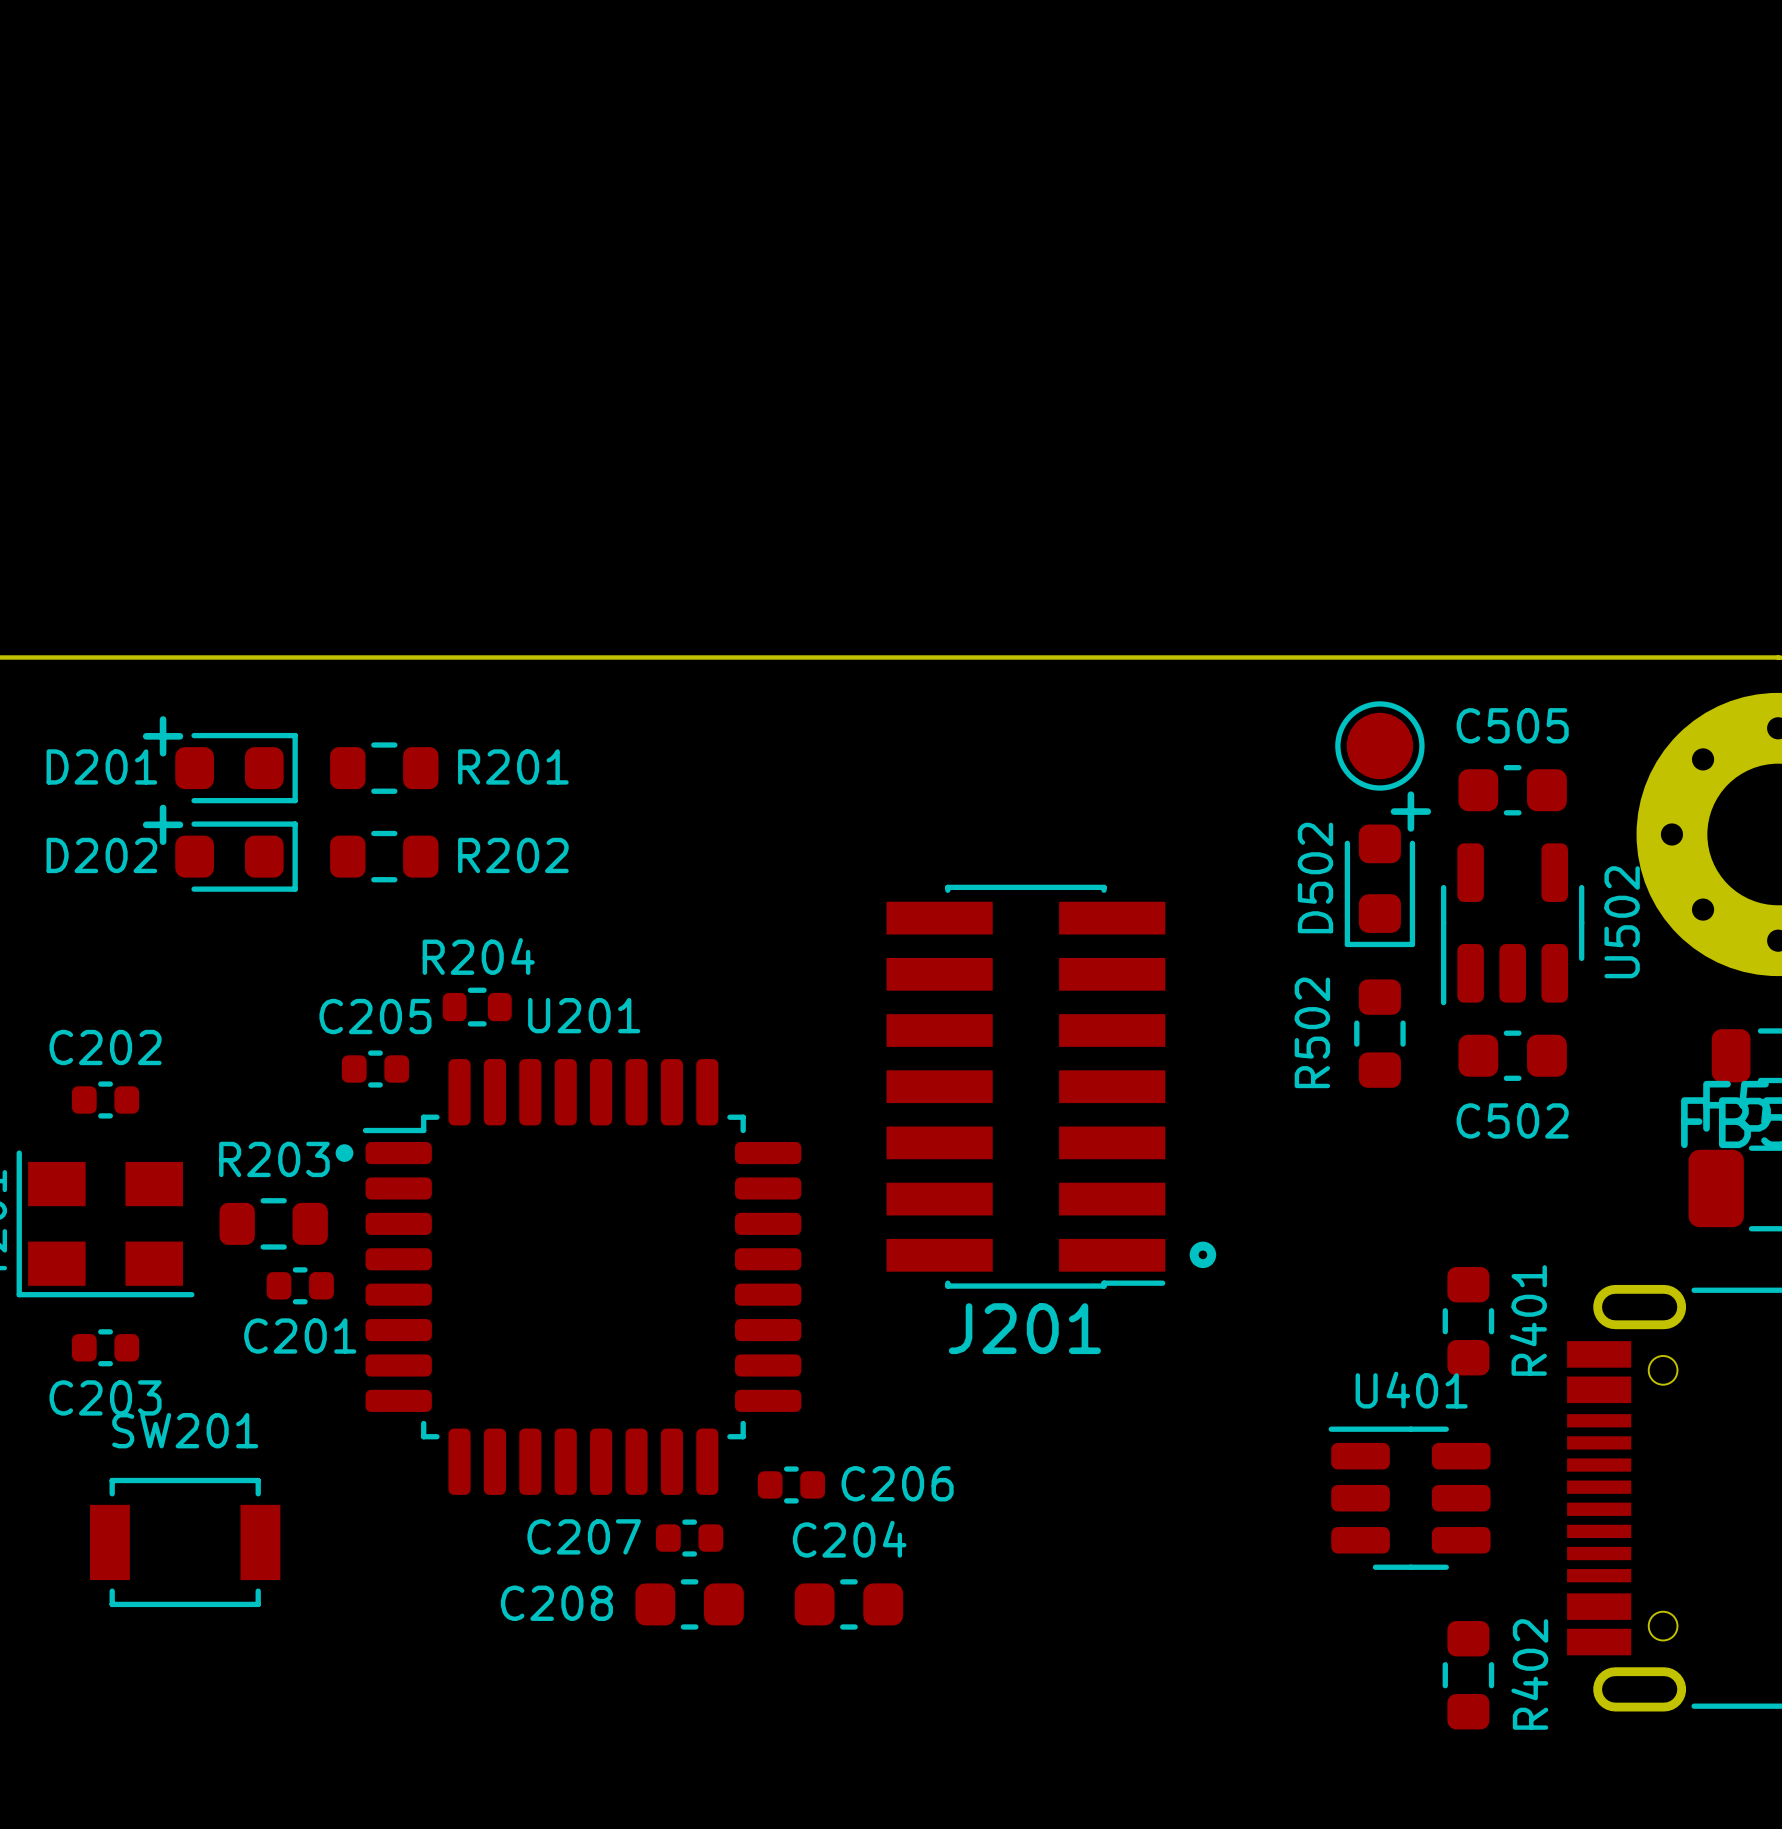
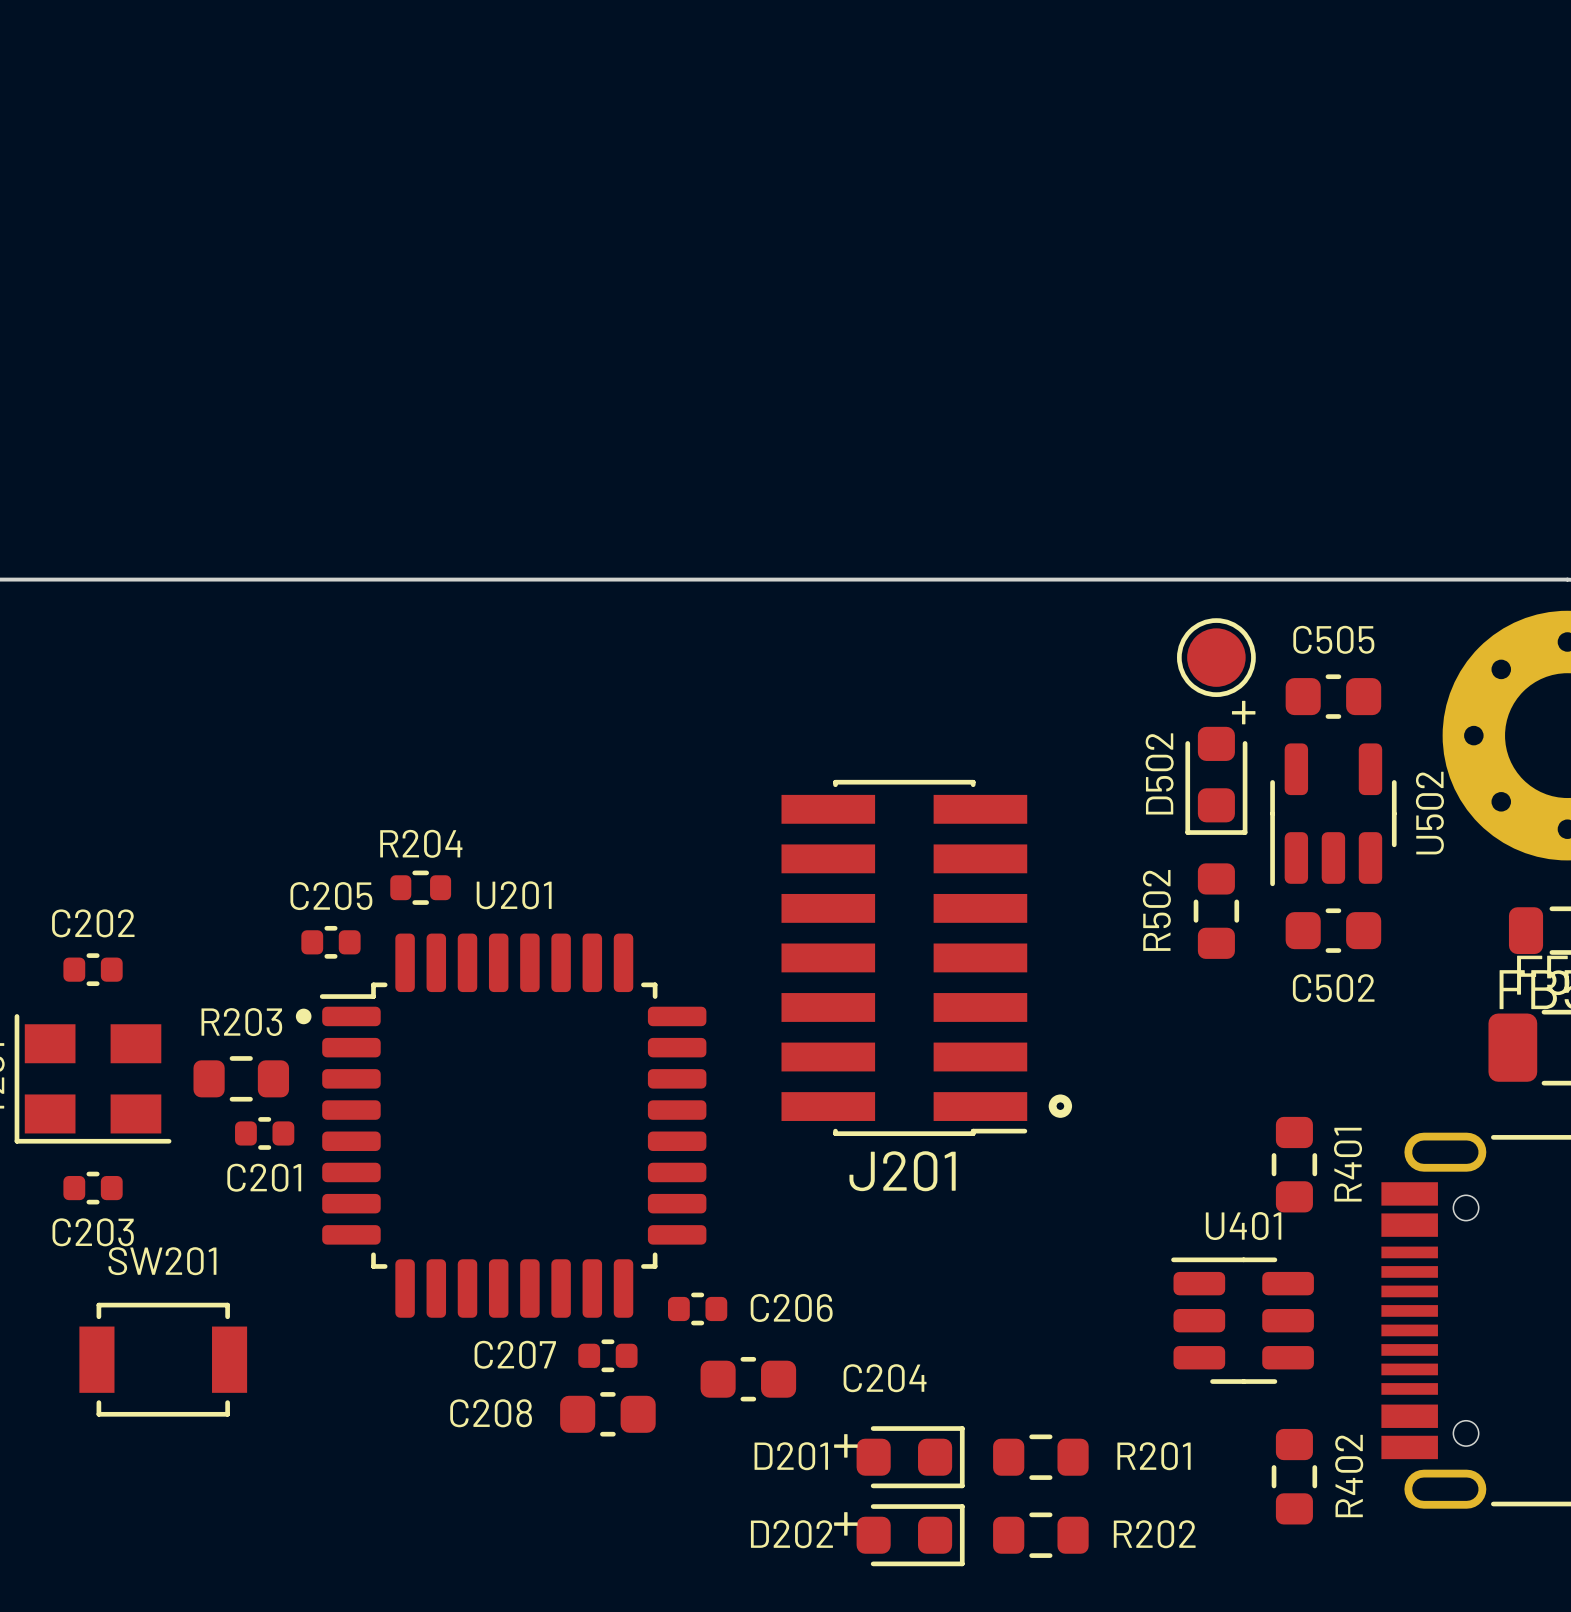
text: + (163, 736) -> none
D201 position: (236, 768) -> (910, 1457)
R201 position: (384, 768) -> (1040, 1457)
text: + (163, 824) -> none
D202 position: (236, 856) -> (910, 1535)
R202 position: (384, 856) -> (1040, 1535)
C204 name position: C204 (849, 1539) -> C204 (885, 1378)
C204 position: (848, 1604) -> (748, 1379)
text: none -> + (845, 1445)
text: none -> + (845, 1523)

